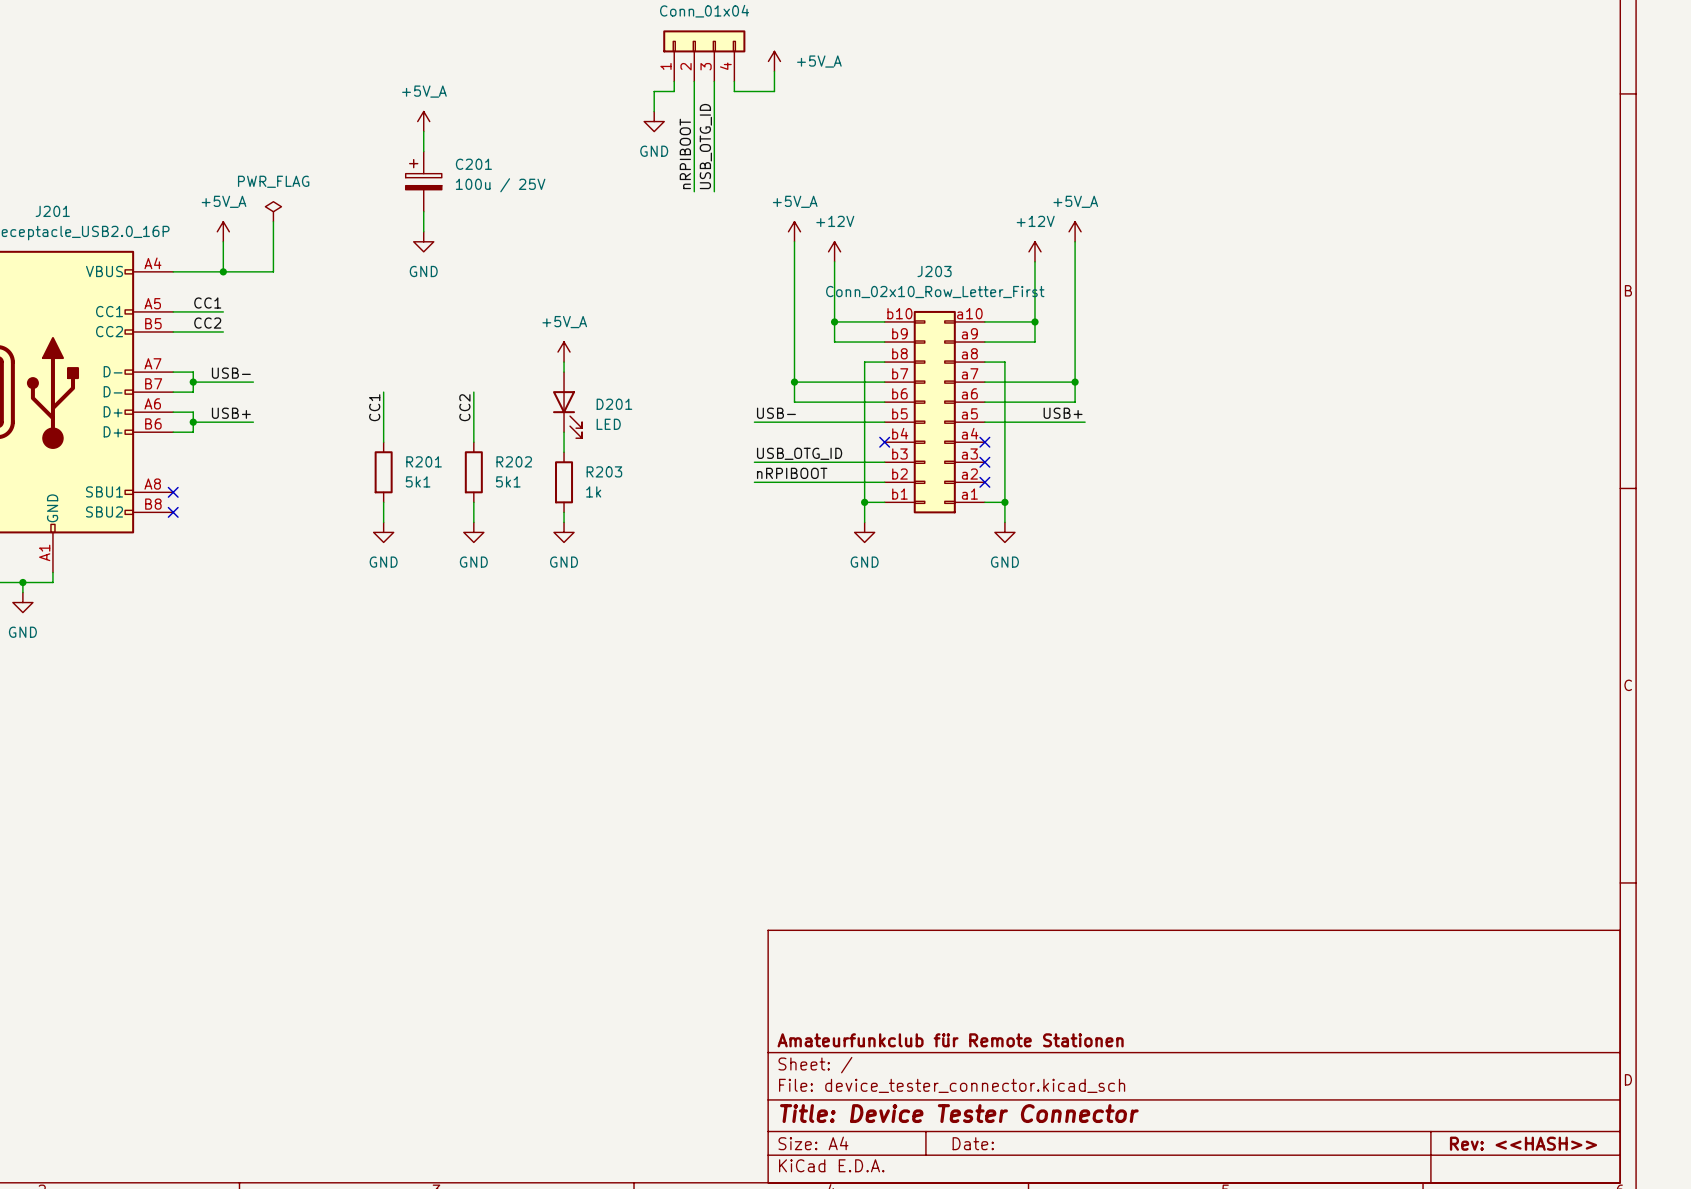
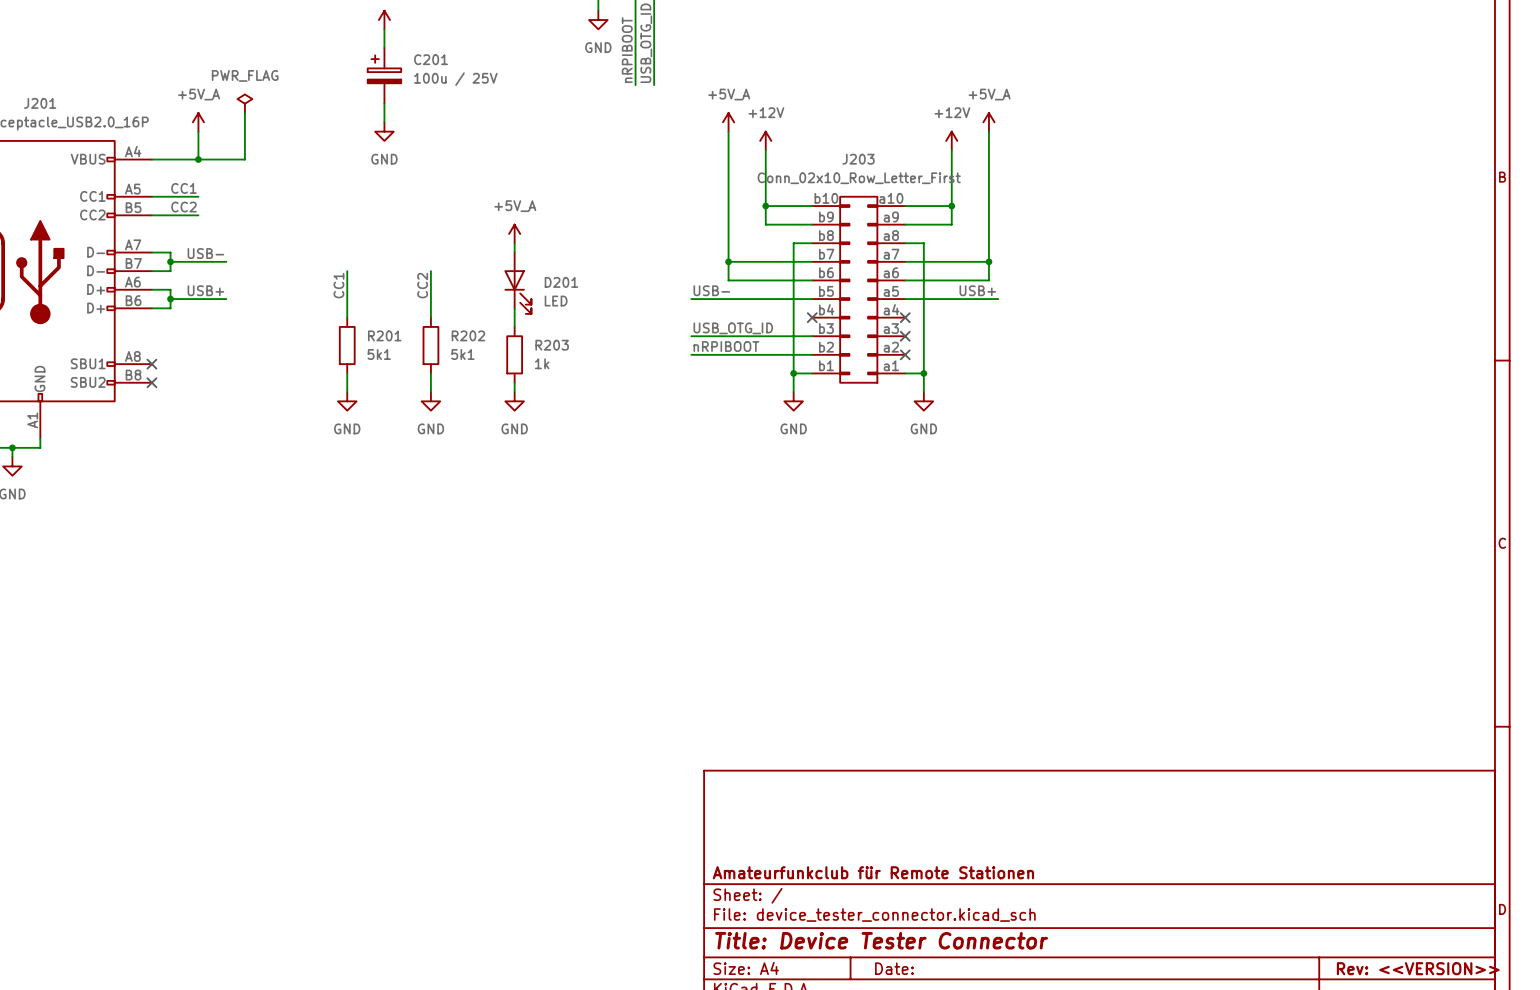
title block: Rev: <<HASH>> (1523, 1143) -> Rev: <<VERSION>> (1418, 968)

